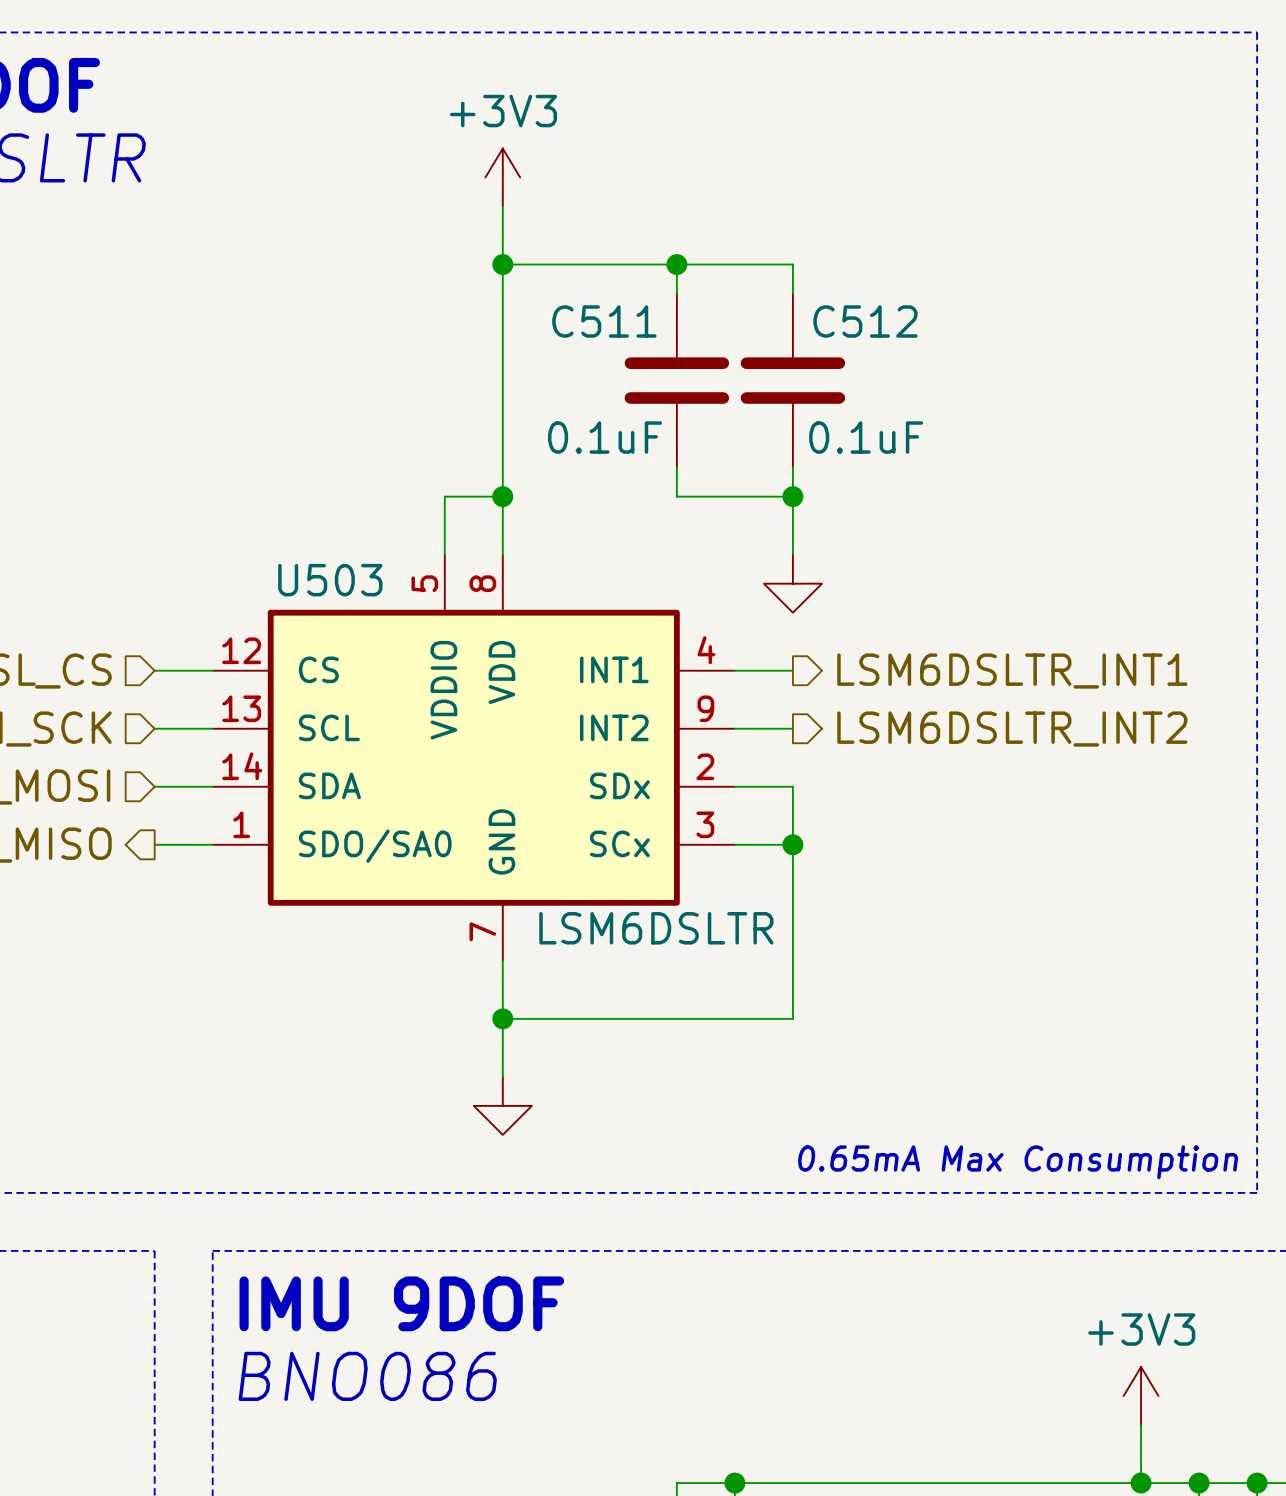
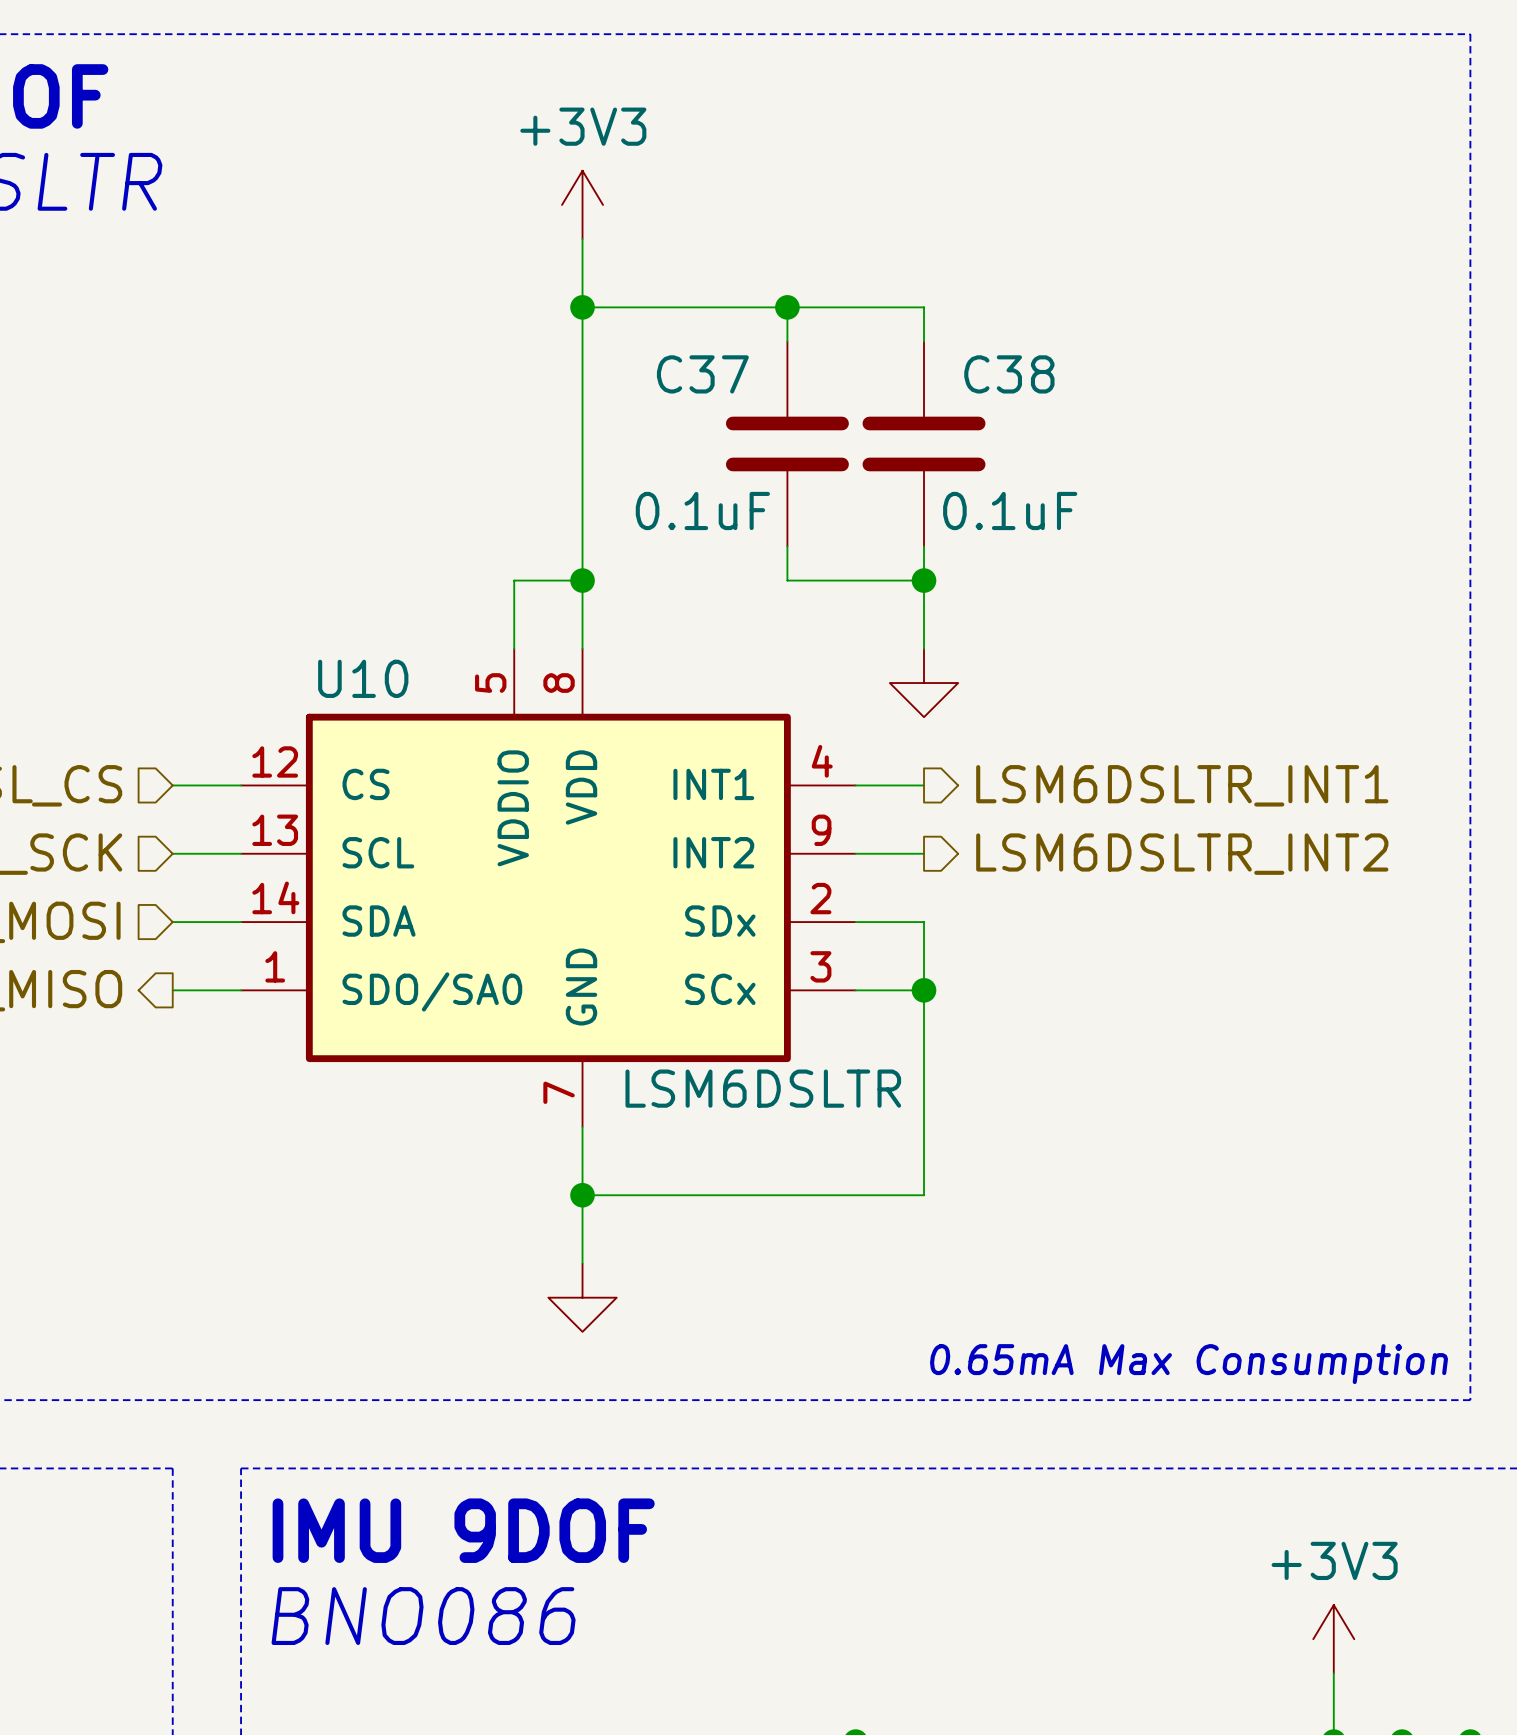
C511 name: C511 (604, 321) -> C37 (702, 374)
C512 name: C512 (865, 321) -> C38 (1009, 374)
U503 name: U503 (330, 580) -> U10 (363, 678)

